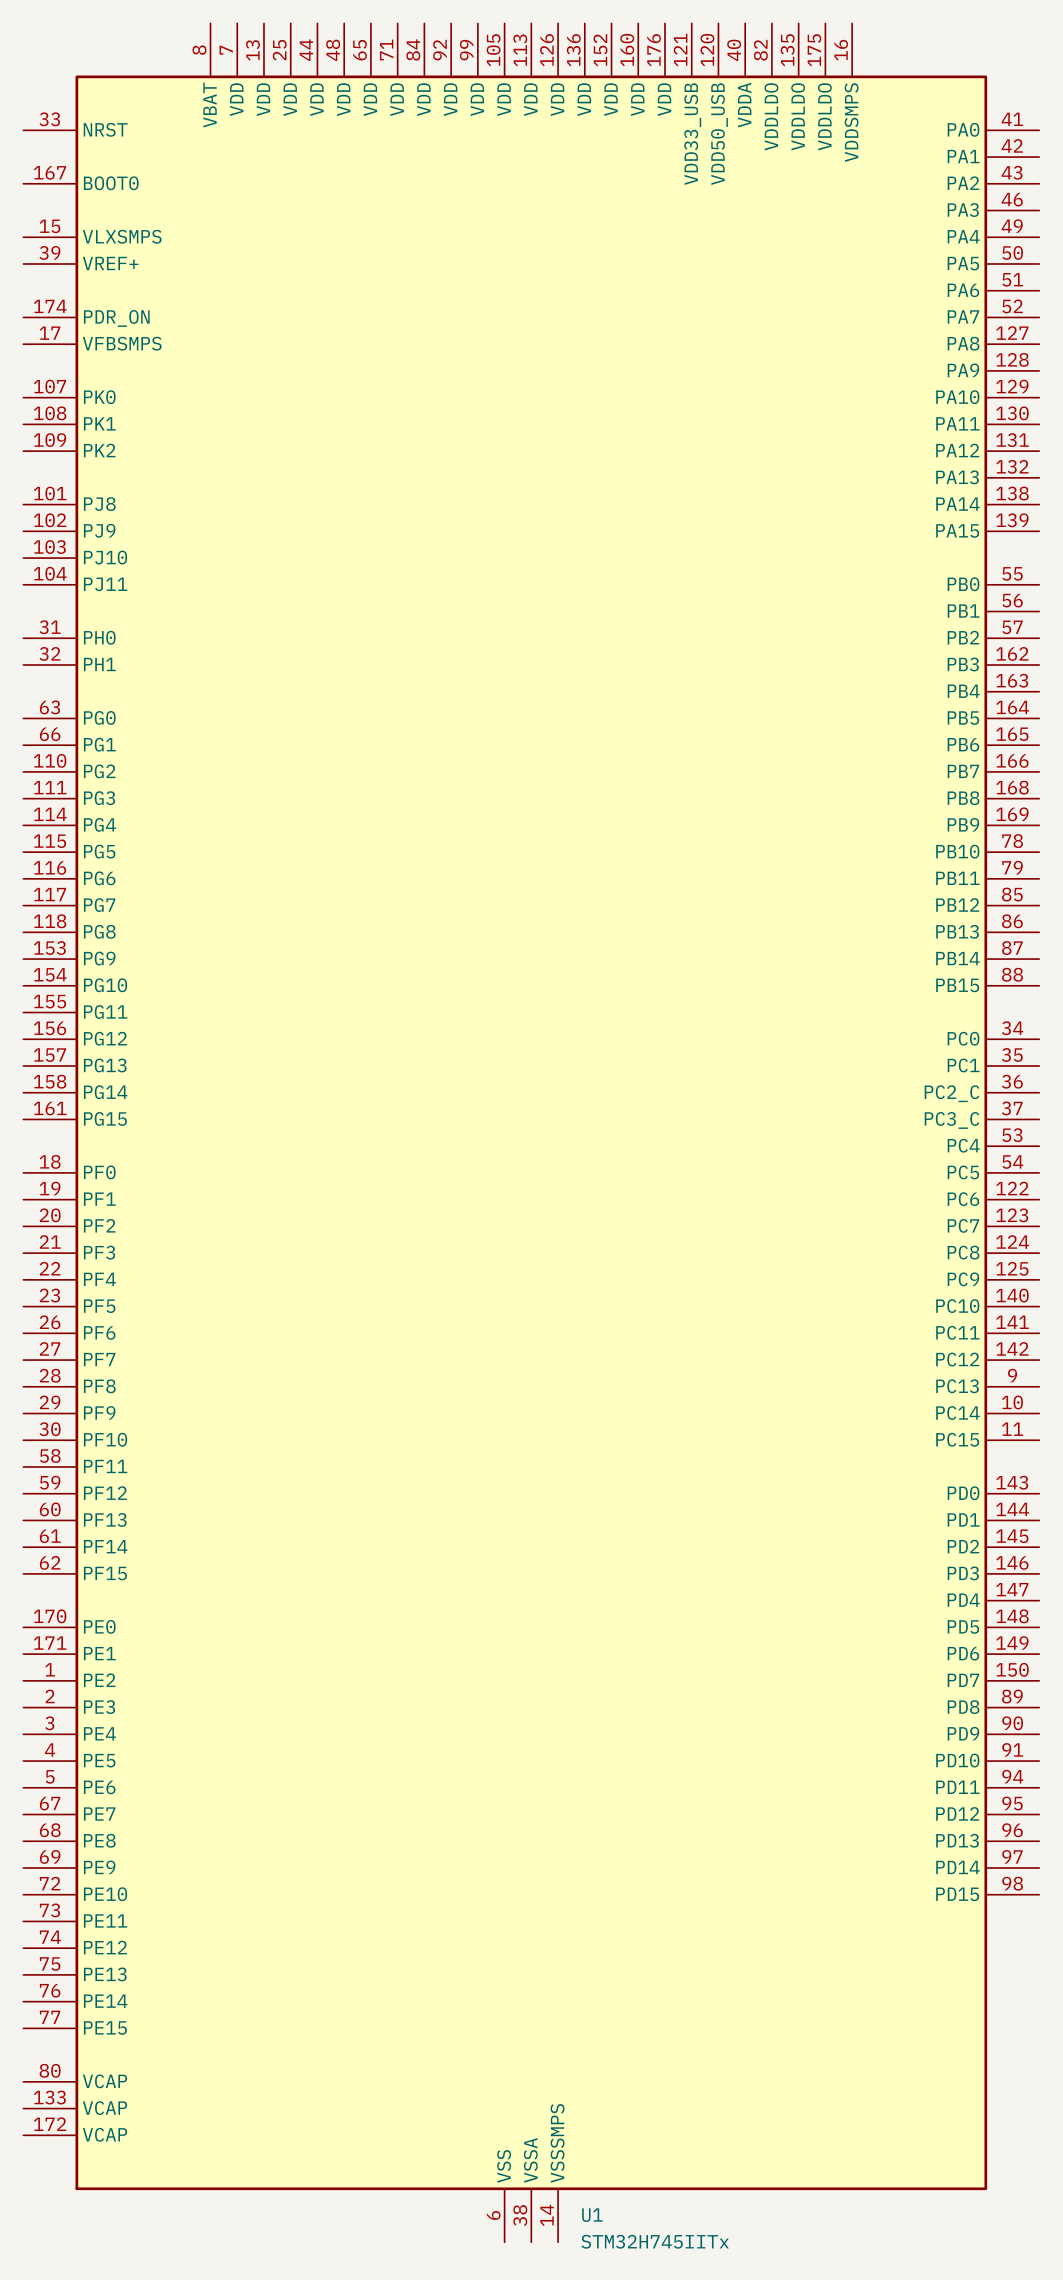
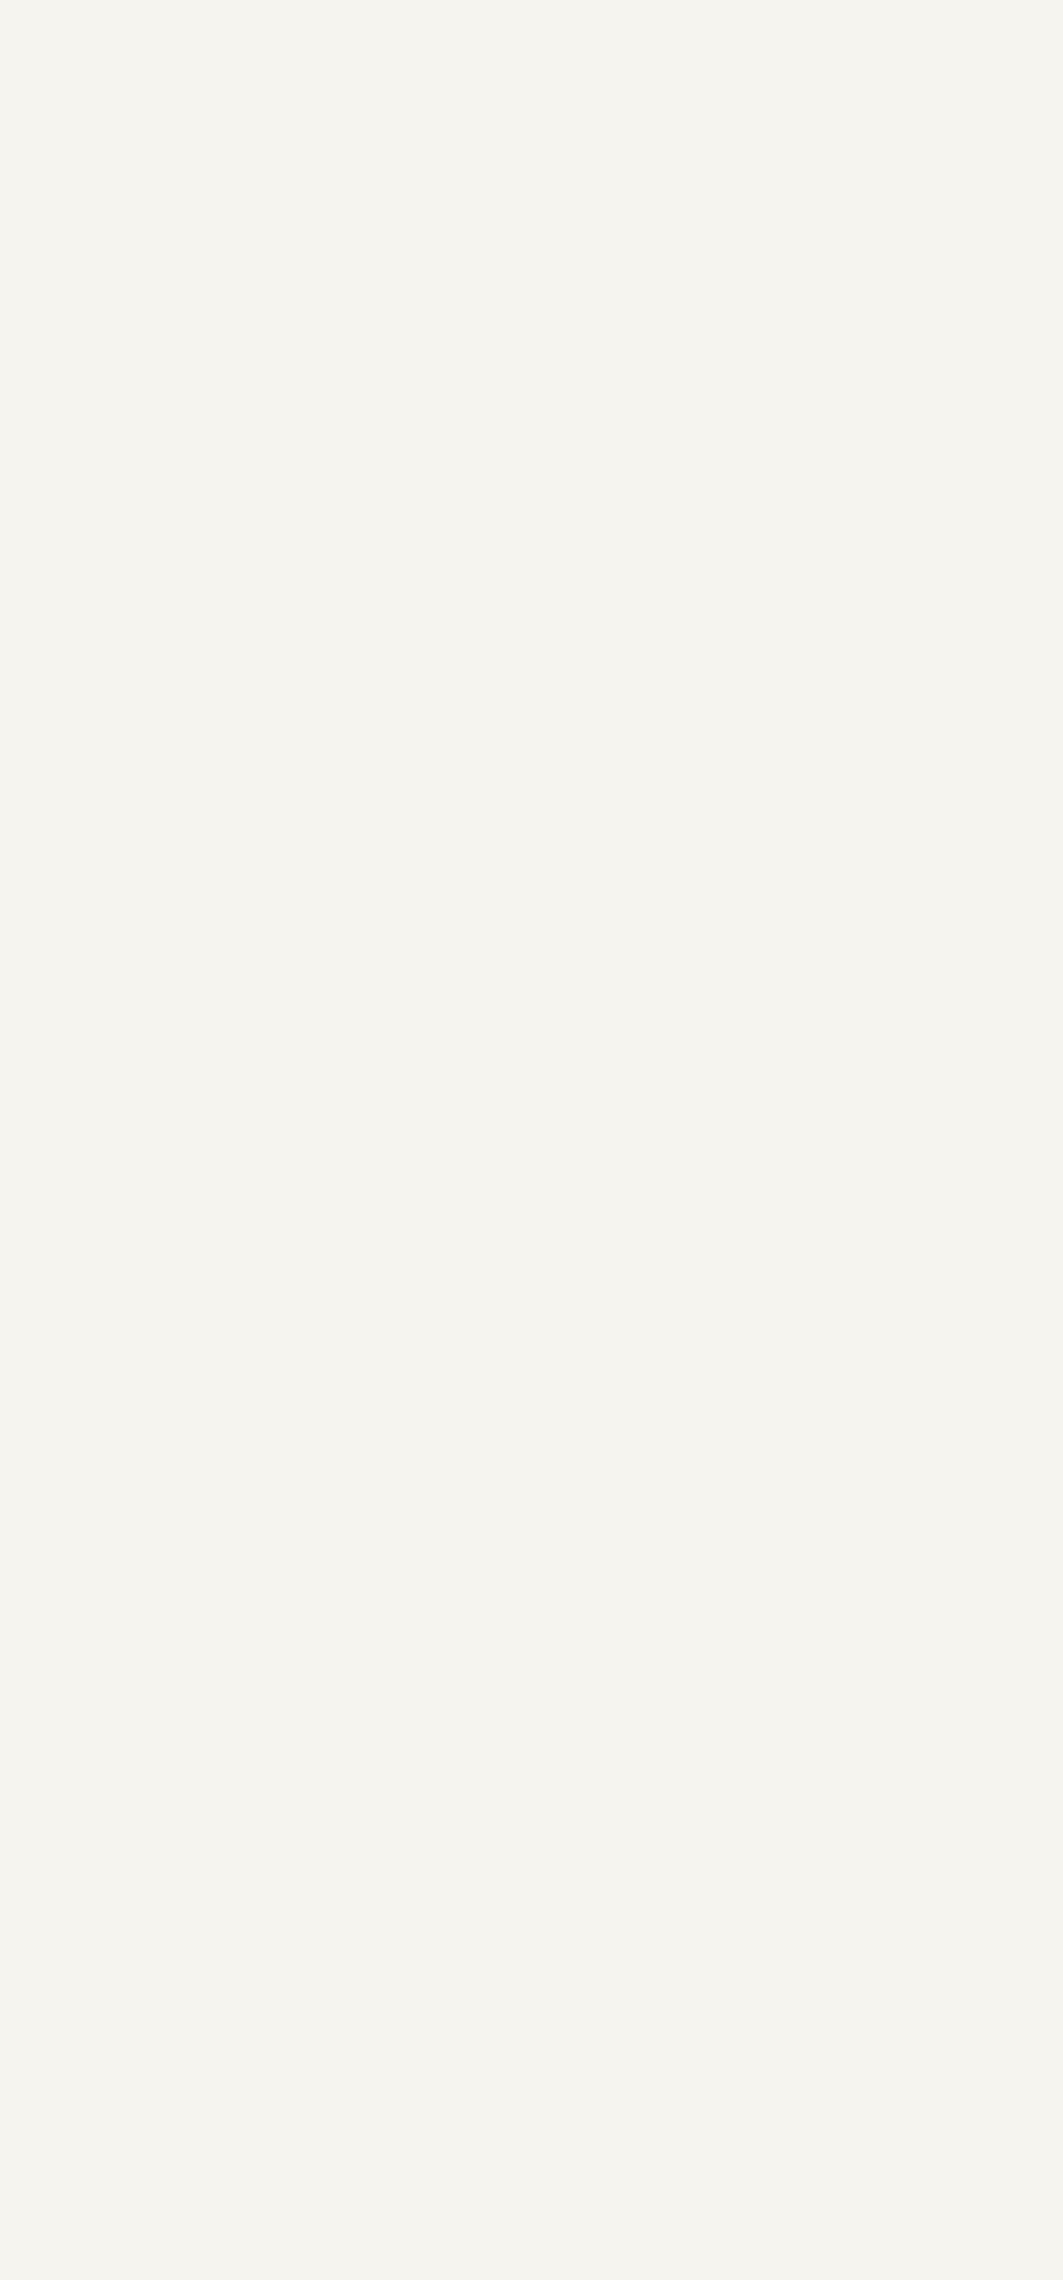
U1: STM32H745IITx (531, 1132) -> none

